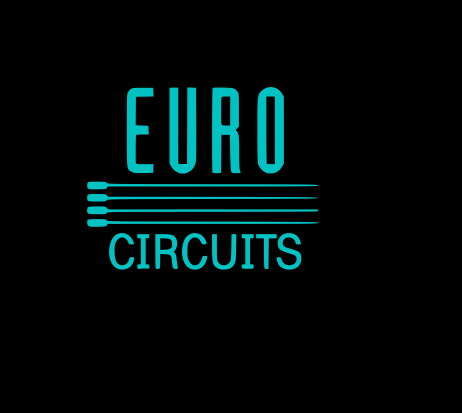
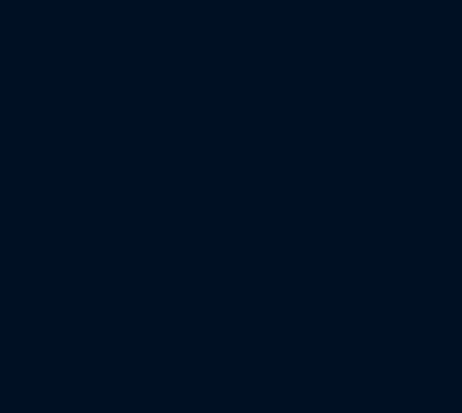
drawing: [87, 87, 319, 270] -> none

